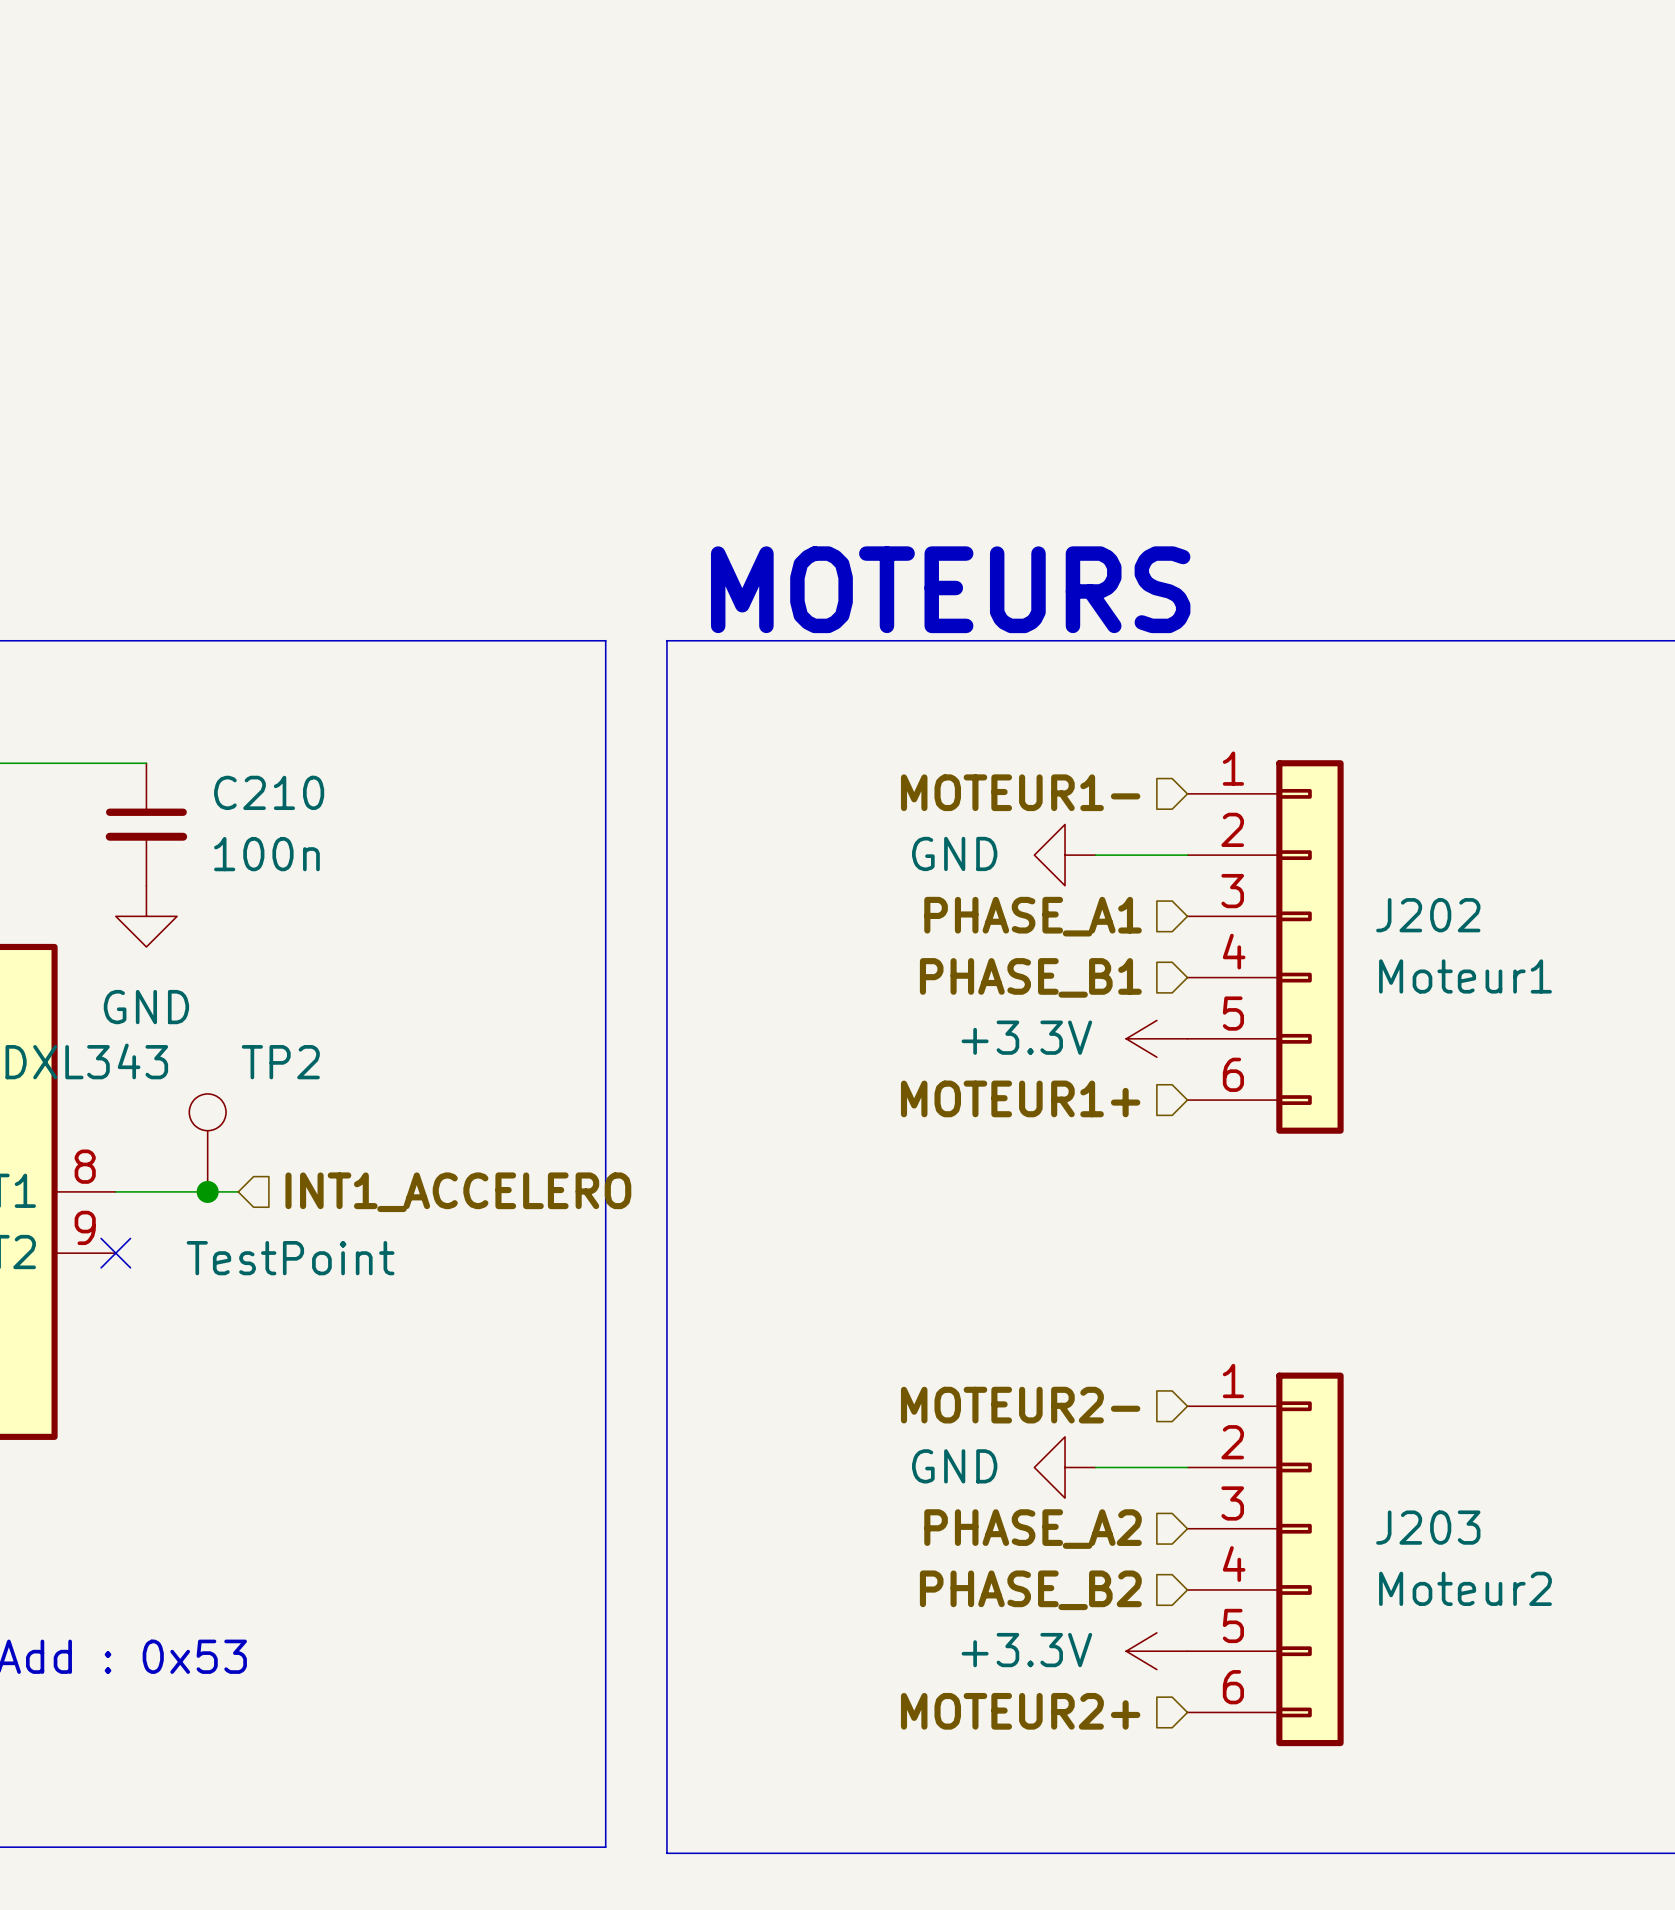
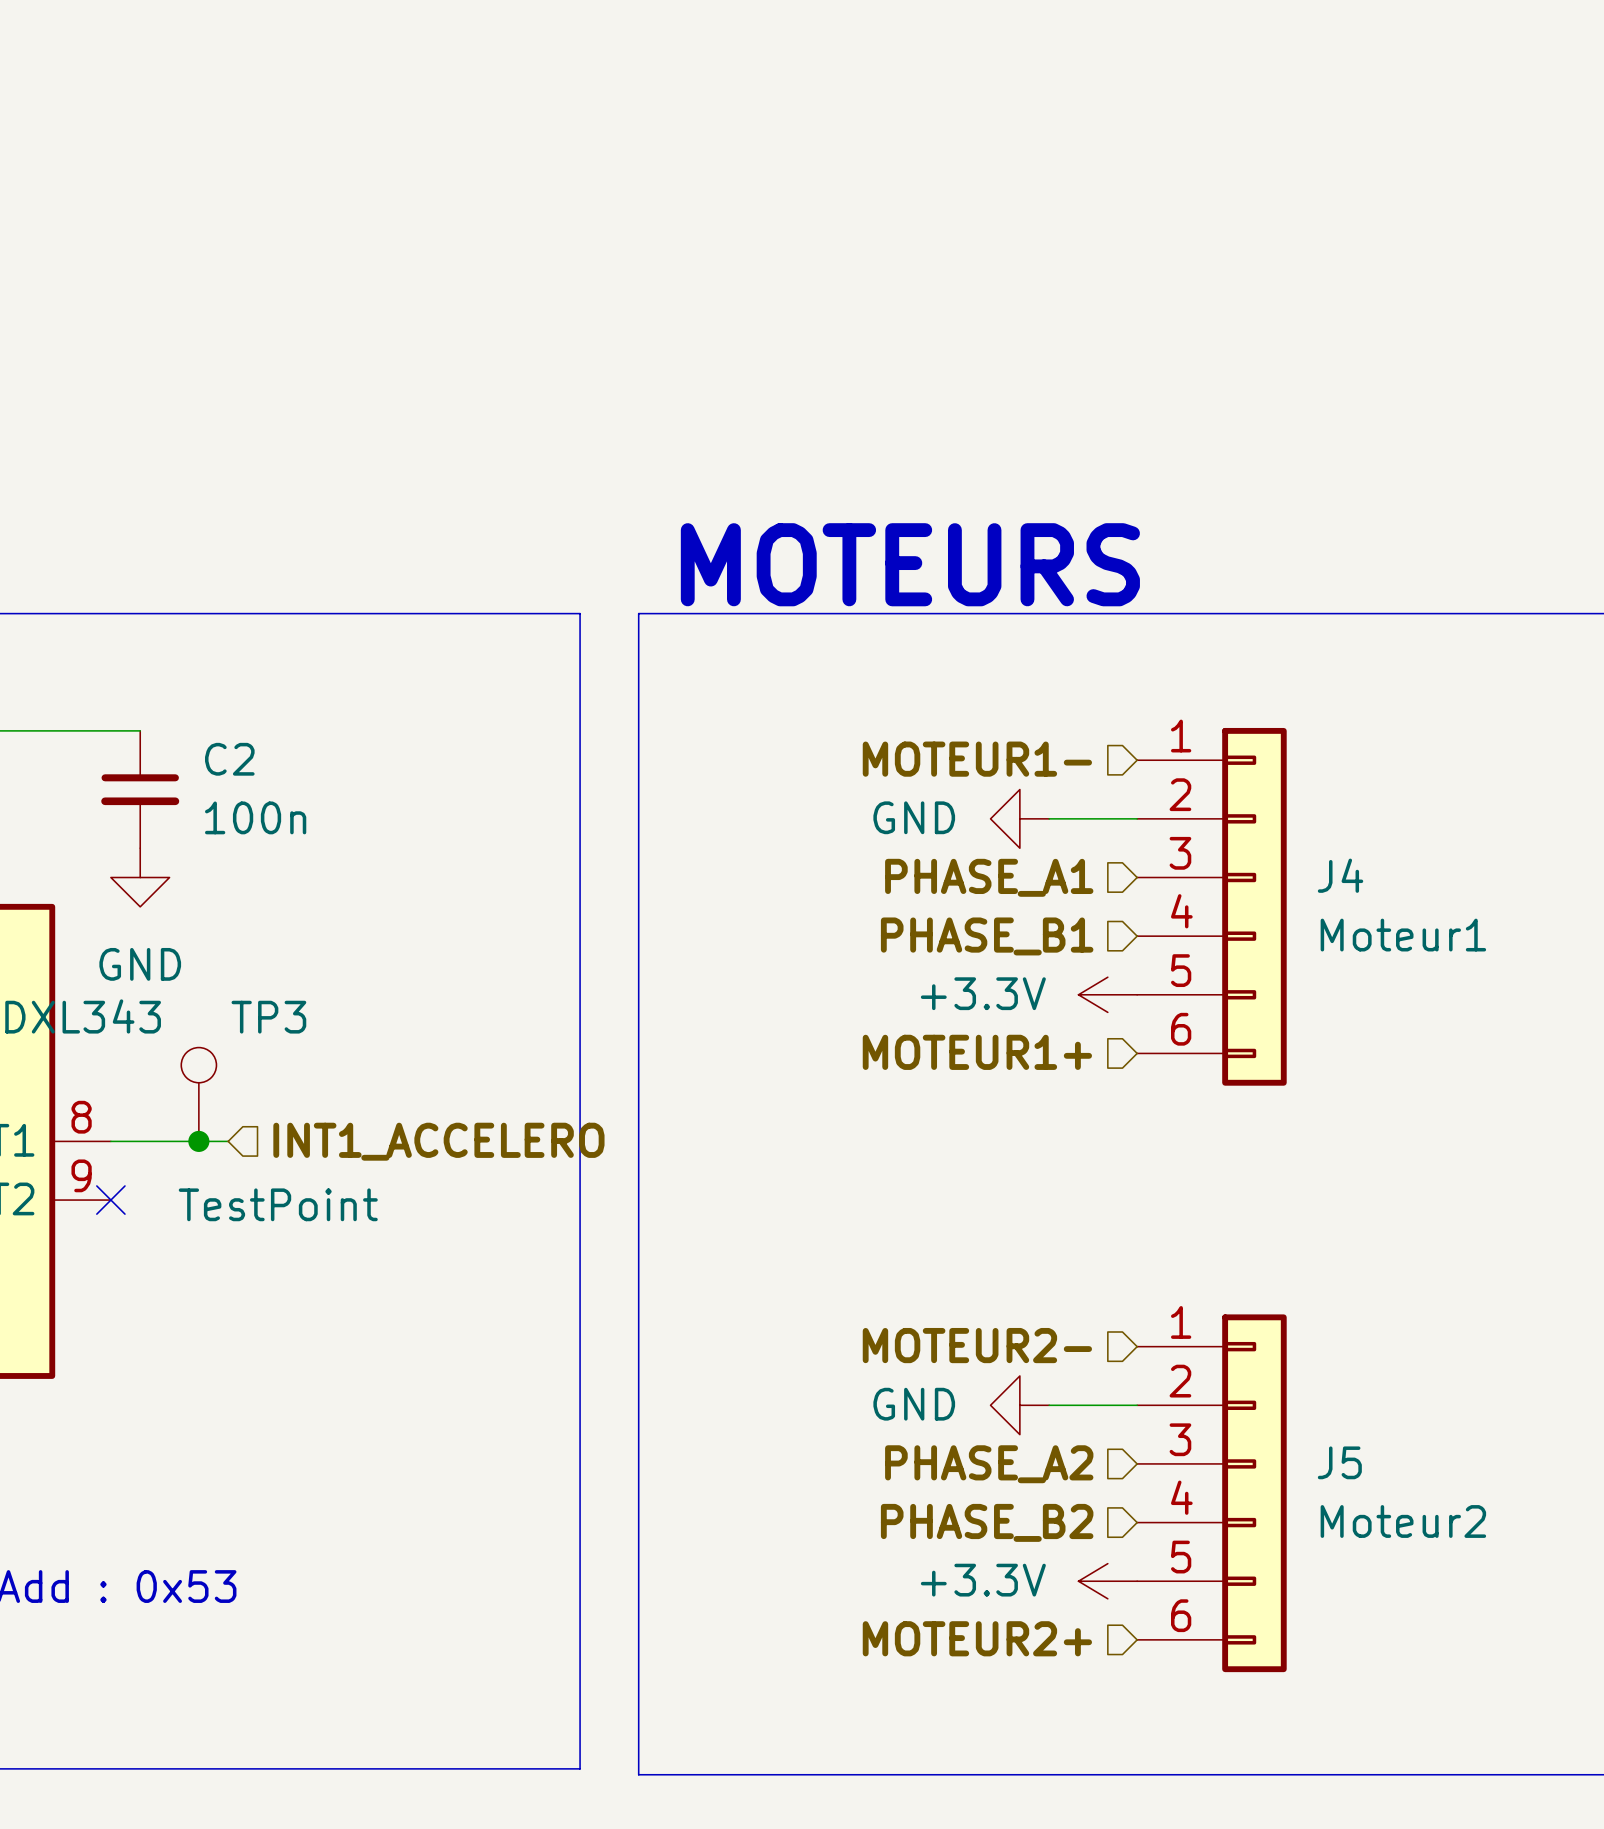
C210 name: C210 (269, 792) -> C2 (229, 759)
J202 name: J202 (1428, 915) -> J4 (1340, 875)
TP2 name: TP2 (280, 1062) -> TP3 (268, 1017)
J203 name: J203 (1428, 1527) -> J5 (1339, 1462)

